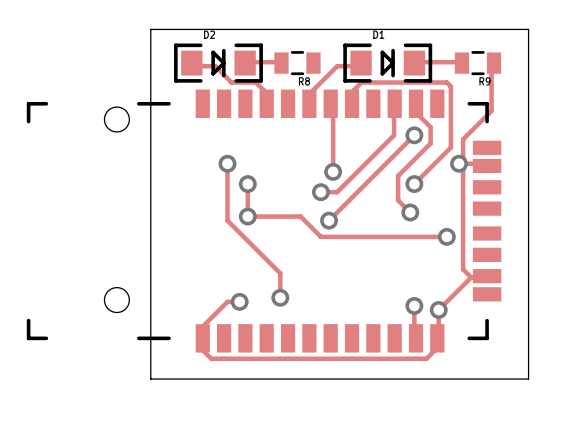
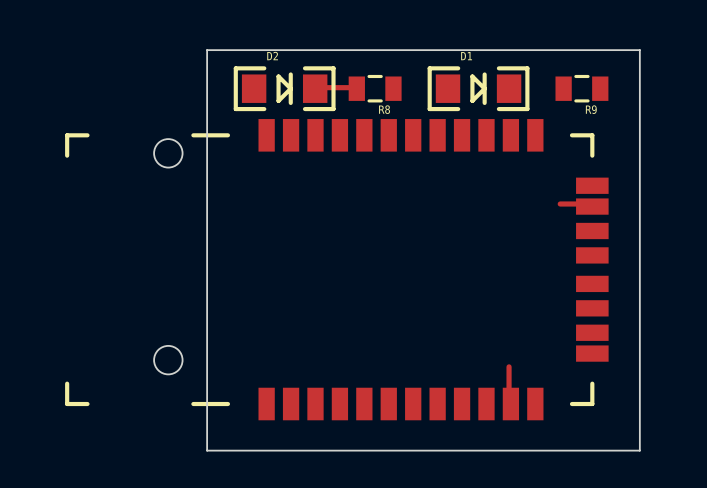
track: (191, 63) (195, 66) (215, 66) (231, 82) (255, 82) (264, 90) (264, 102) (266, 103) -> none
track: (361, 63) (357, 66) (337, 66) (312, 90) (312, 102) (309, 103) -> none
track: (414, 63) (462, 63) -> none
track: (493, 63) (491, 66) (491, 110) (463, 139) (463, 269) (471, 277) -> none
track: (330, 103) (333, 106) (333, 171) -> none
track: (352, 103) (353, 90) (361, 82) (446, 82) (450, 86) (450, 147) (414, 184) -> none
track: (394, 103) (394, 135) (337, 192) (320, 192) -> none
track: (415, 103) (418, 106) (418, 115) (430, 127) (430, 143) (398, 175) (398, 200) (410, 212) -> none
track: (414, 135) (329, 220) -> none
via: (414, 135) -> none
track: (227, 163) (227, 220) (280, 273) (280, 297) -> none
via: (227, 163) -> none
via: (459, 163) -> none
via: (333, 171) -> none
track: (247, 184) (247, 216) (300, 216) (320, 236) (446, 236) -> none
via: (247, 184) -> none
via: (414, 184) -> none
via: (320, 192) -> none
via: (410, 212) -> none
via: (247, 216) -> none
via: (329, 220) -> none
via: (446, 236) -> none
track: (471, 277) (438, 309) (438, 334) (437, 338) (434, 338) (434, 350) (426, 358) (211, 358) (203, 350) (203, 326) (227, 301) (239, 301) -> none
via: (280, 297) -> none
via: (239, 301) -> none
via: (414, 305) -> none
via: (438, 309) -> none

